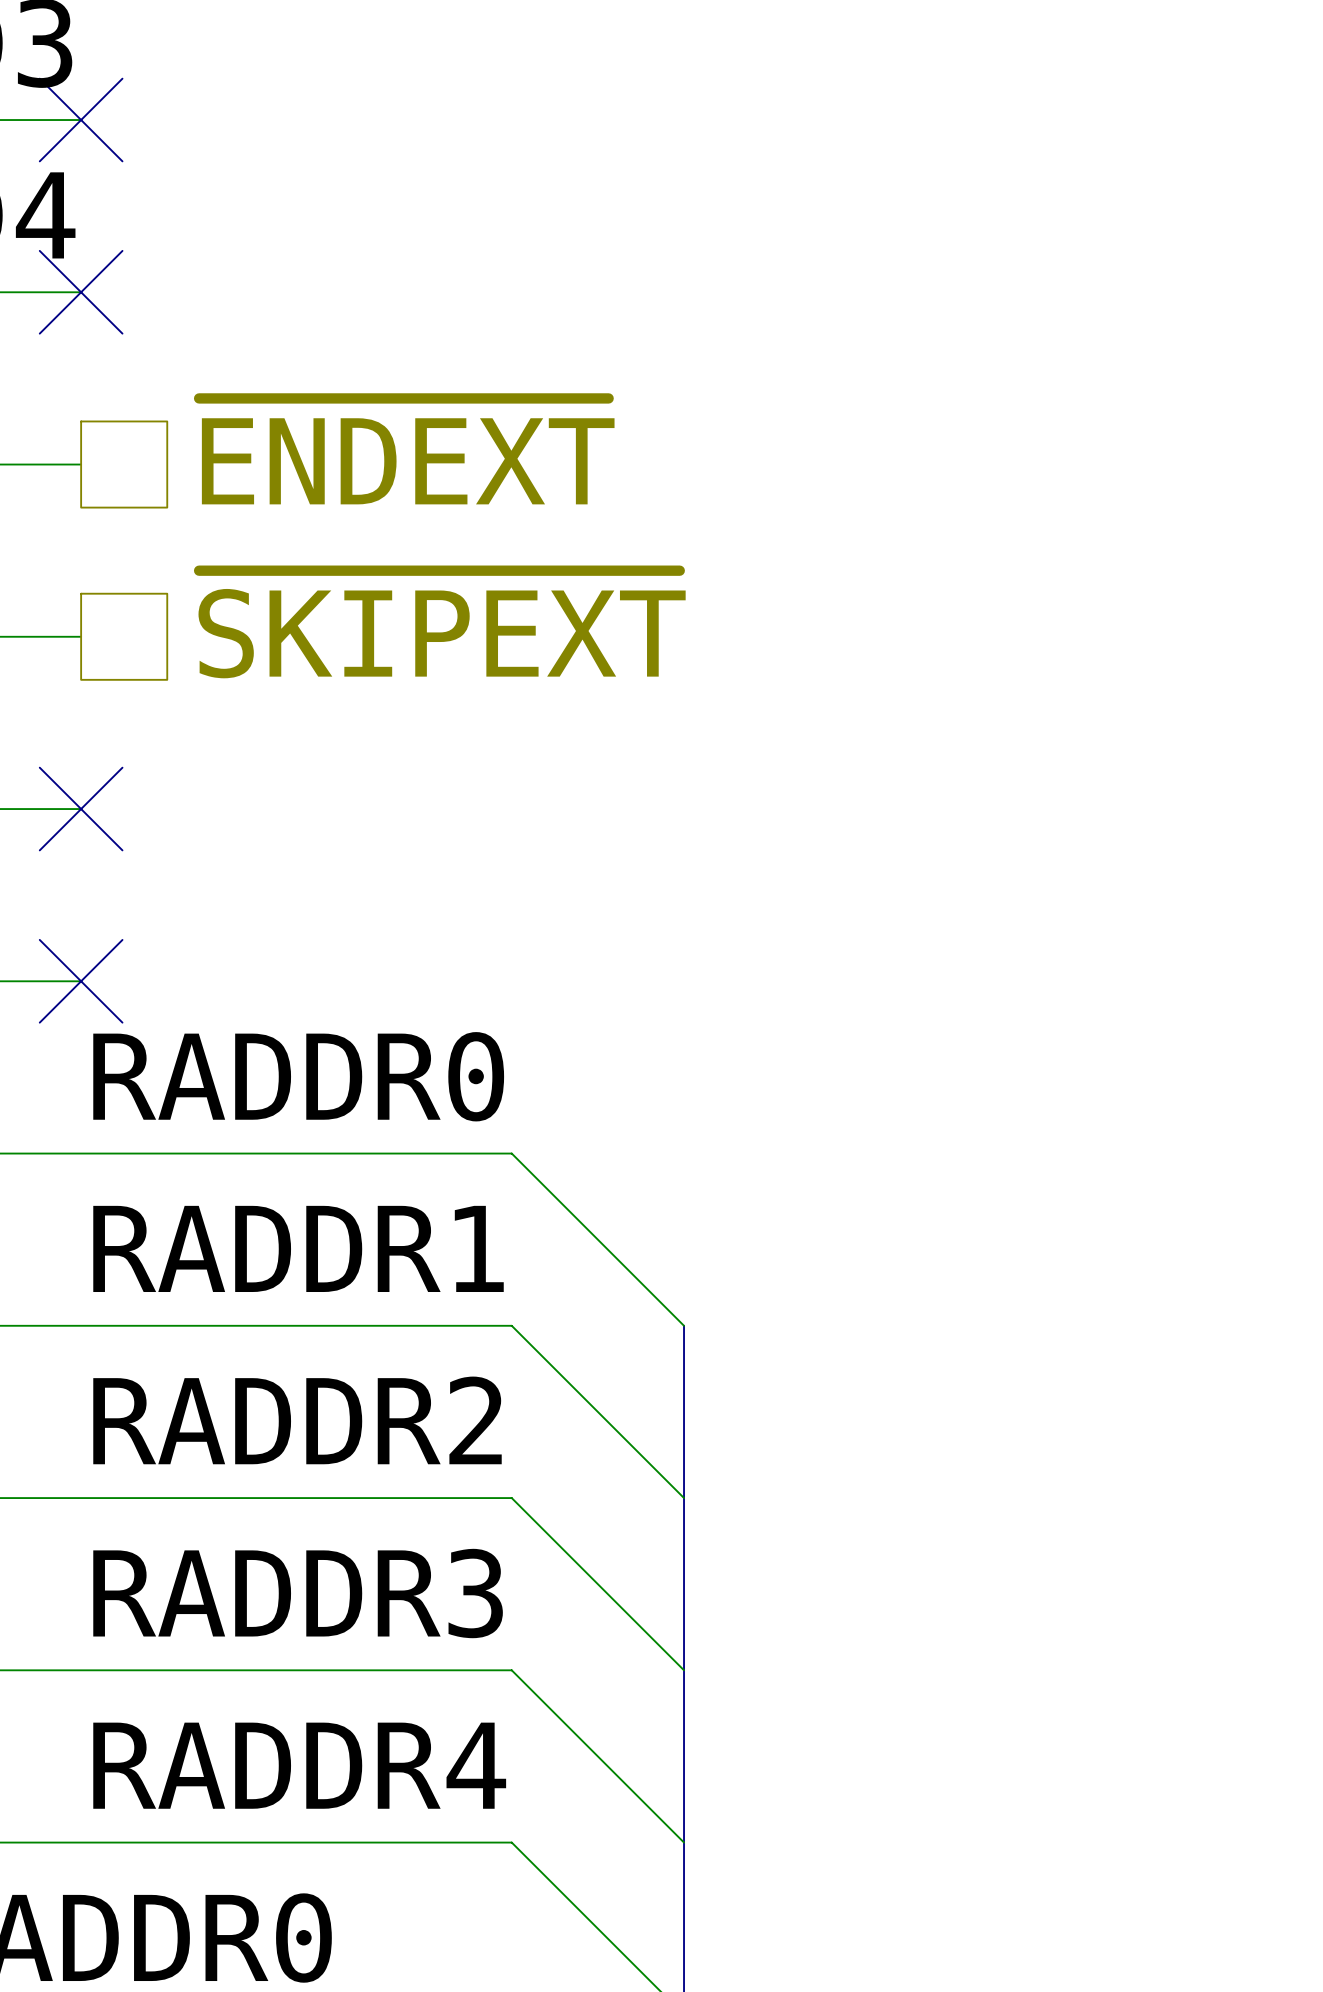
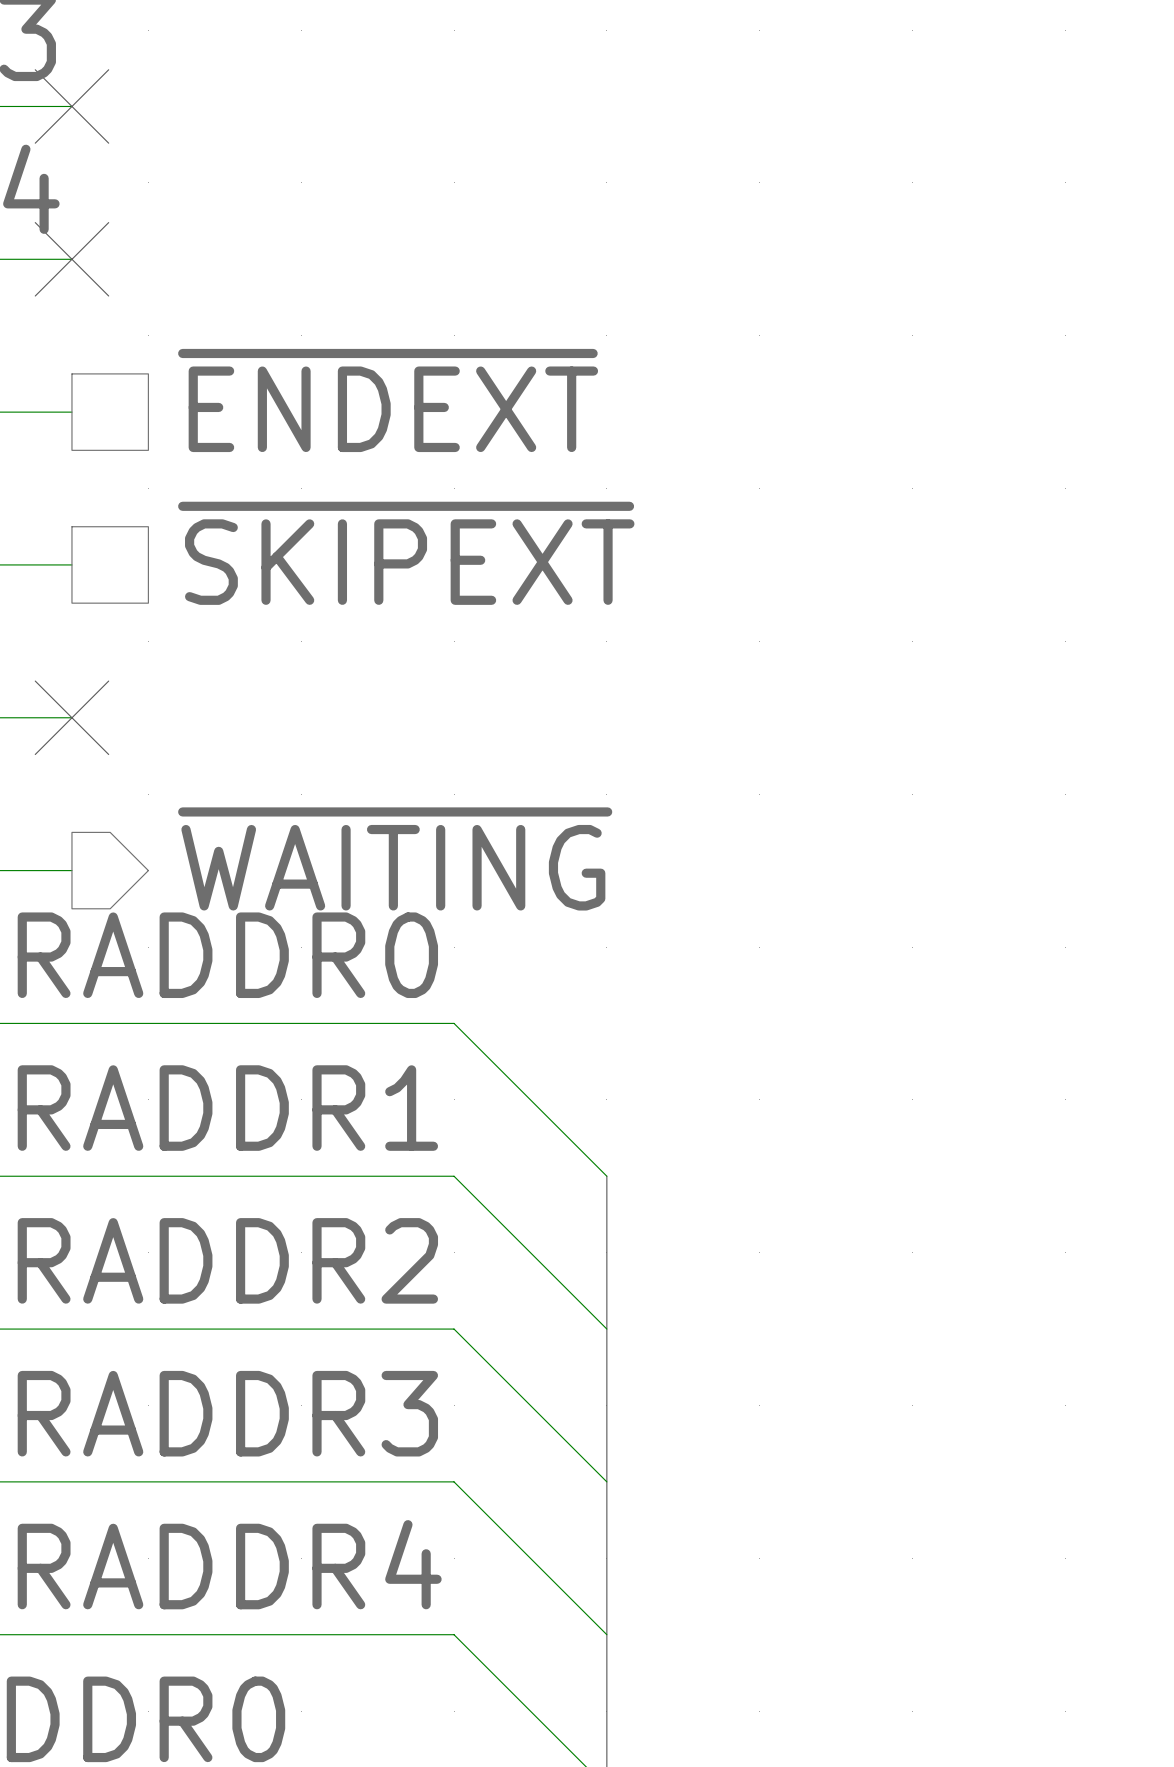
hierarchical label: none -> ~{WAITING} (395, 858)
no-connect mark: (81, 981) -> none

